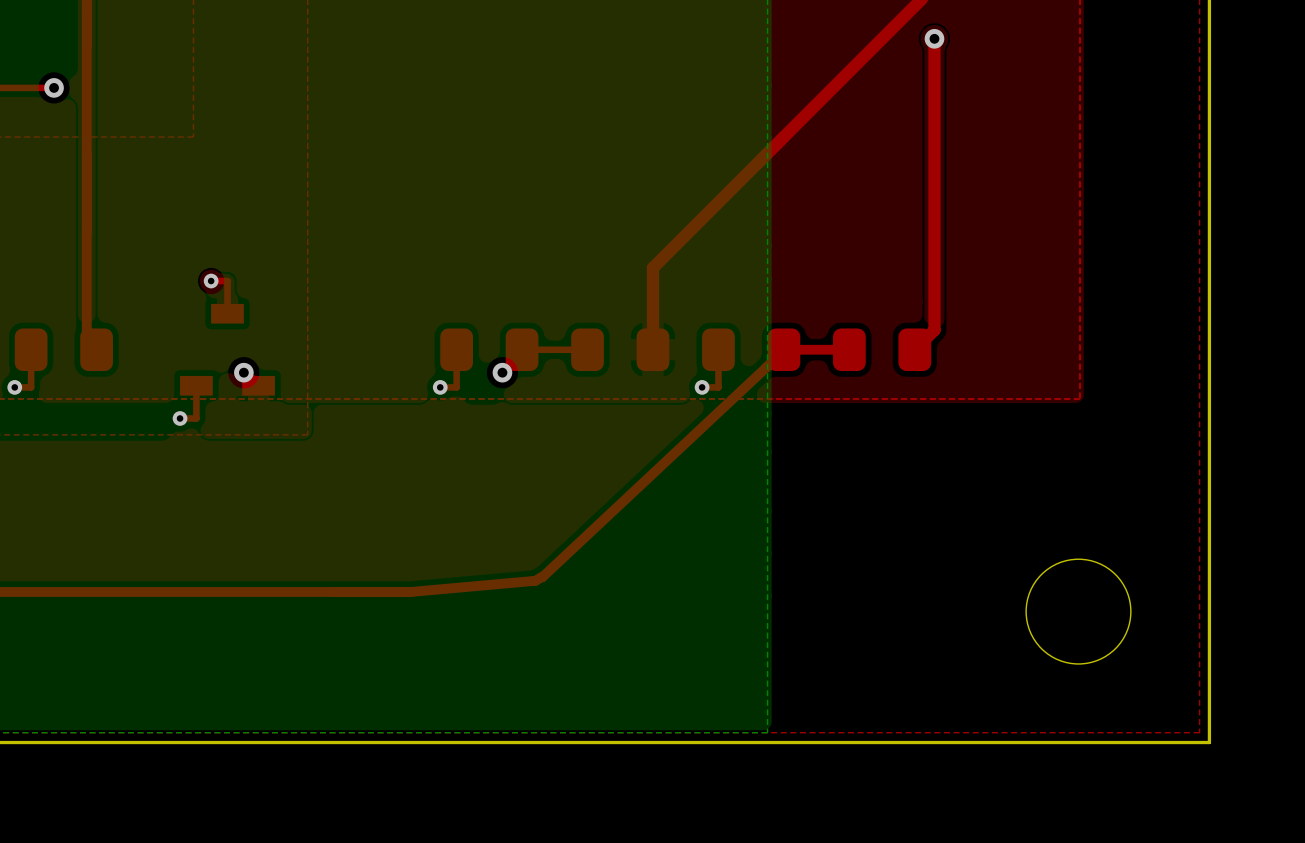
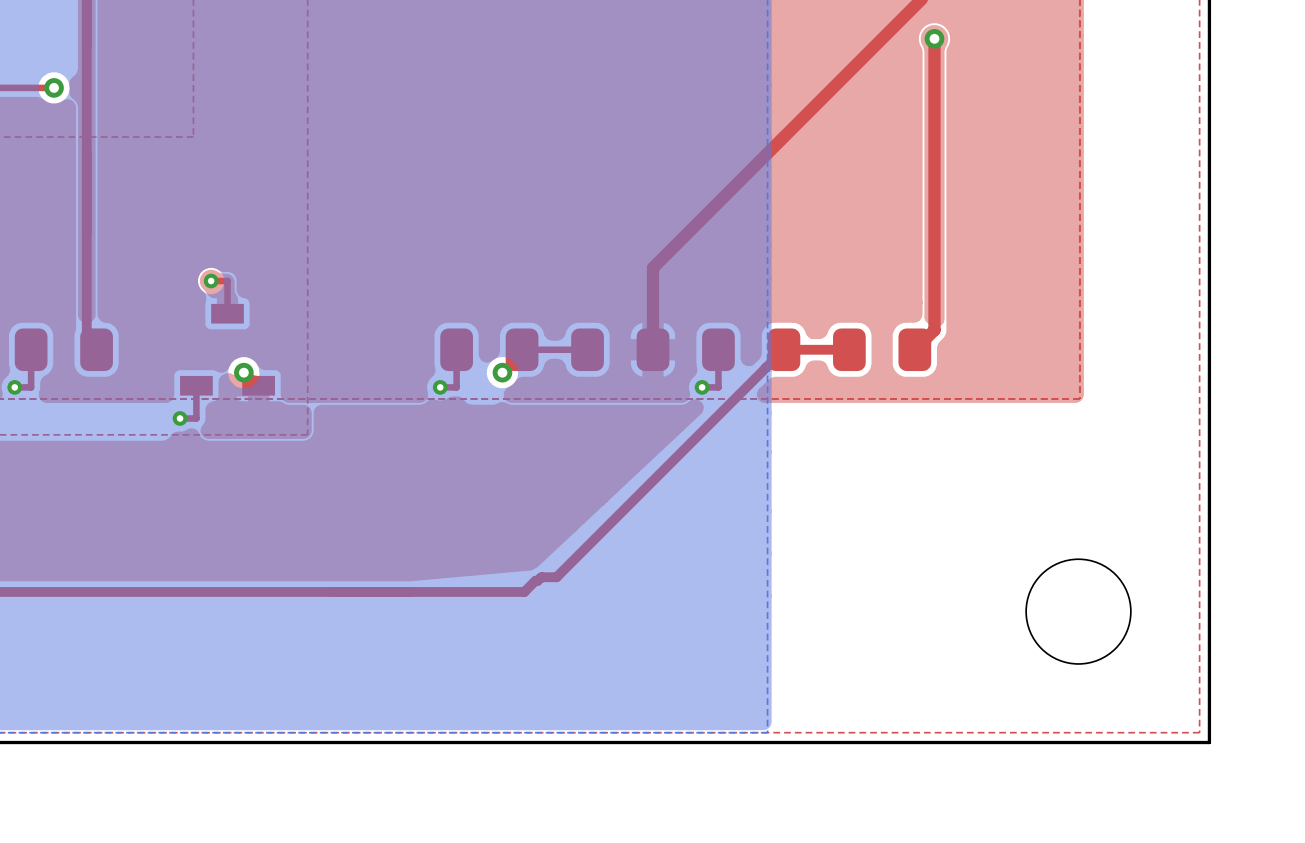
top track: (783, 349) (542, 577) (535, 580) (410, 591) -> (783, 349) (556, 577) (542, 577)
top track: none -> (542, 577) (535, 580) (524, 591) (410, 591)

